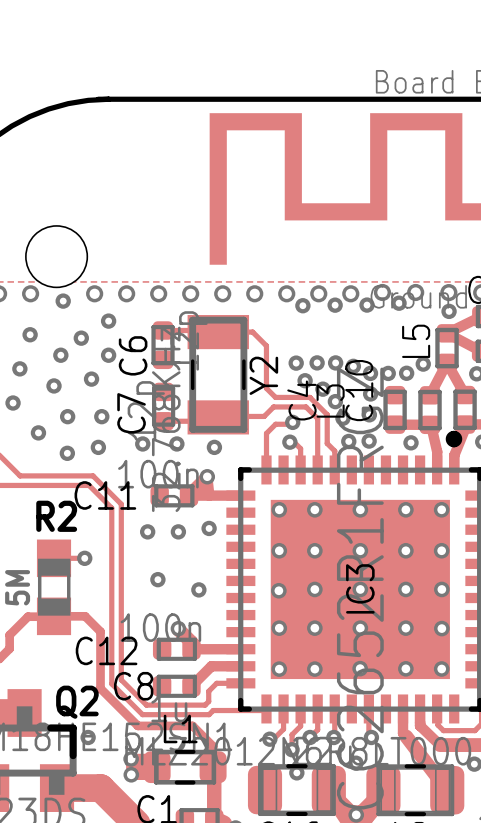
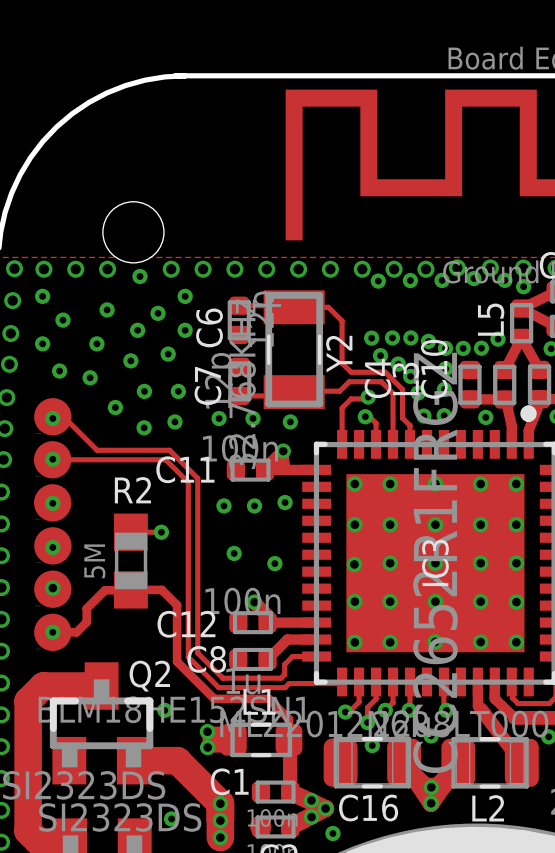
via: none -> (504, 280)

